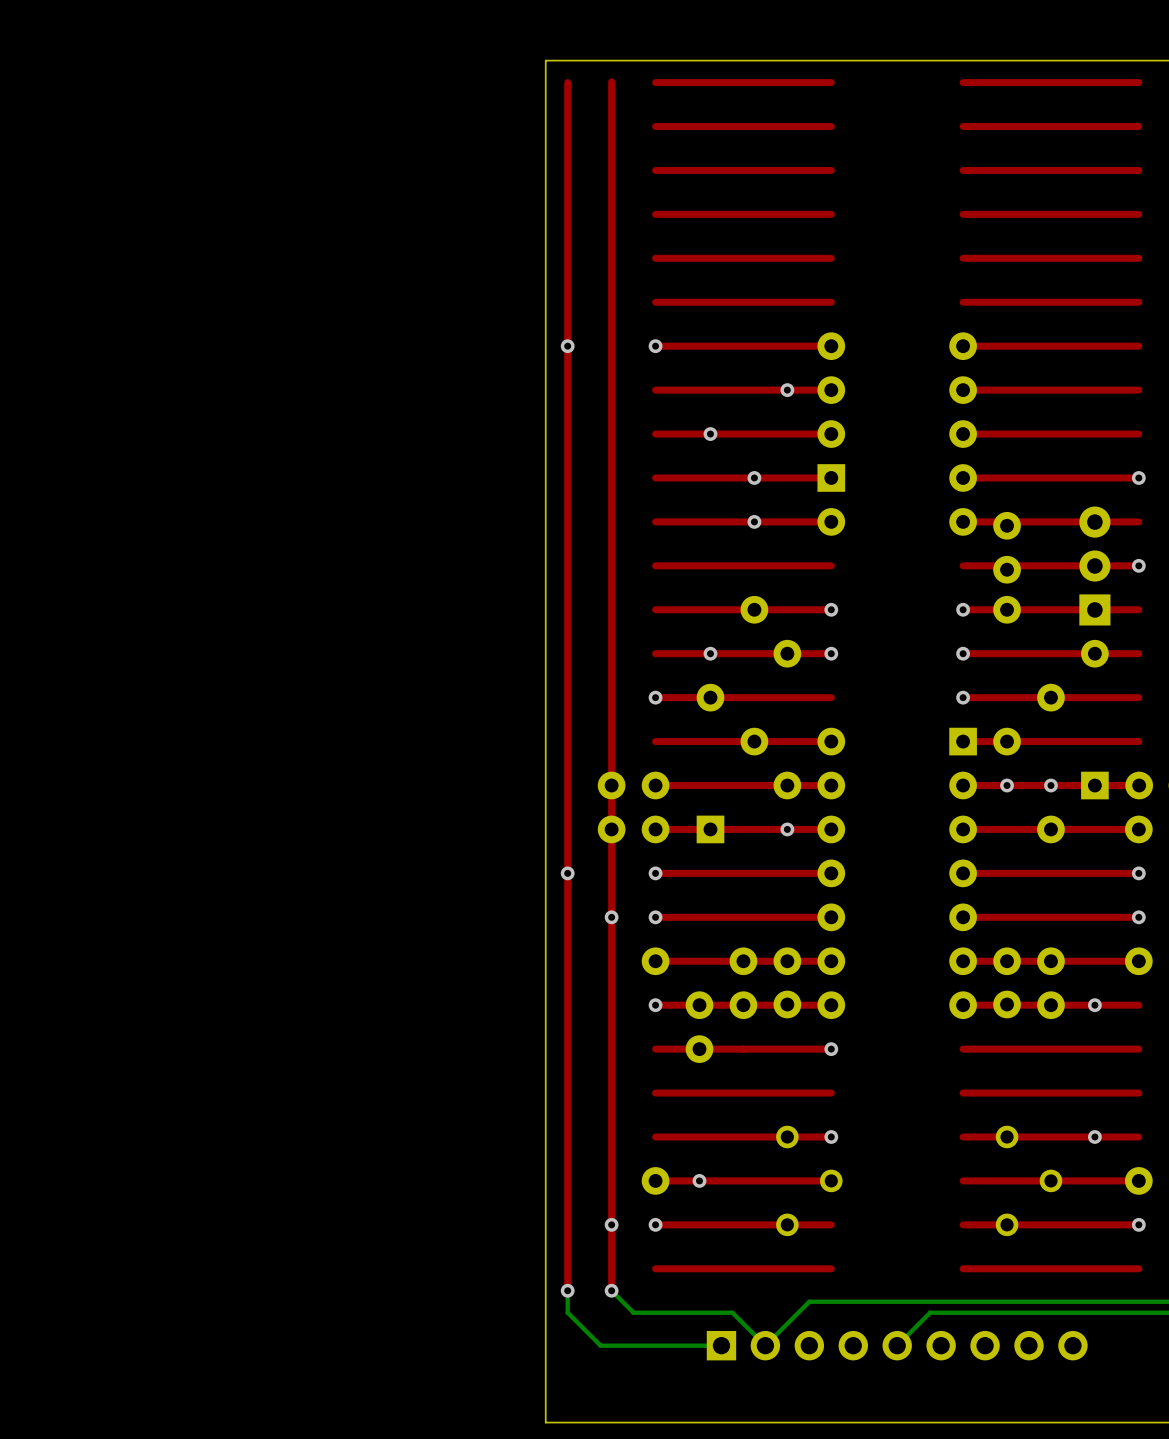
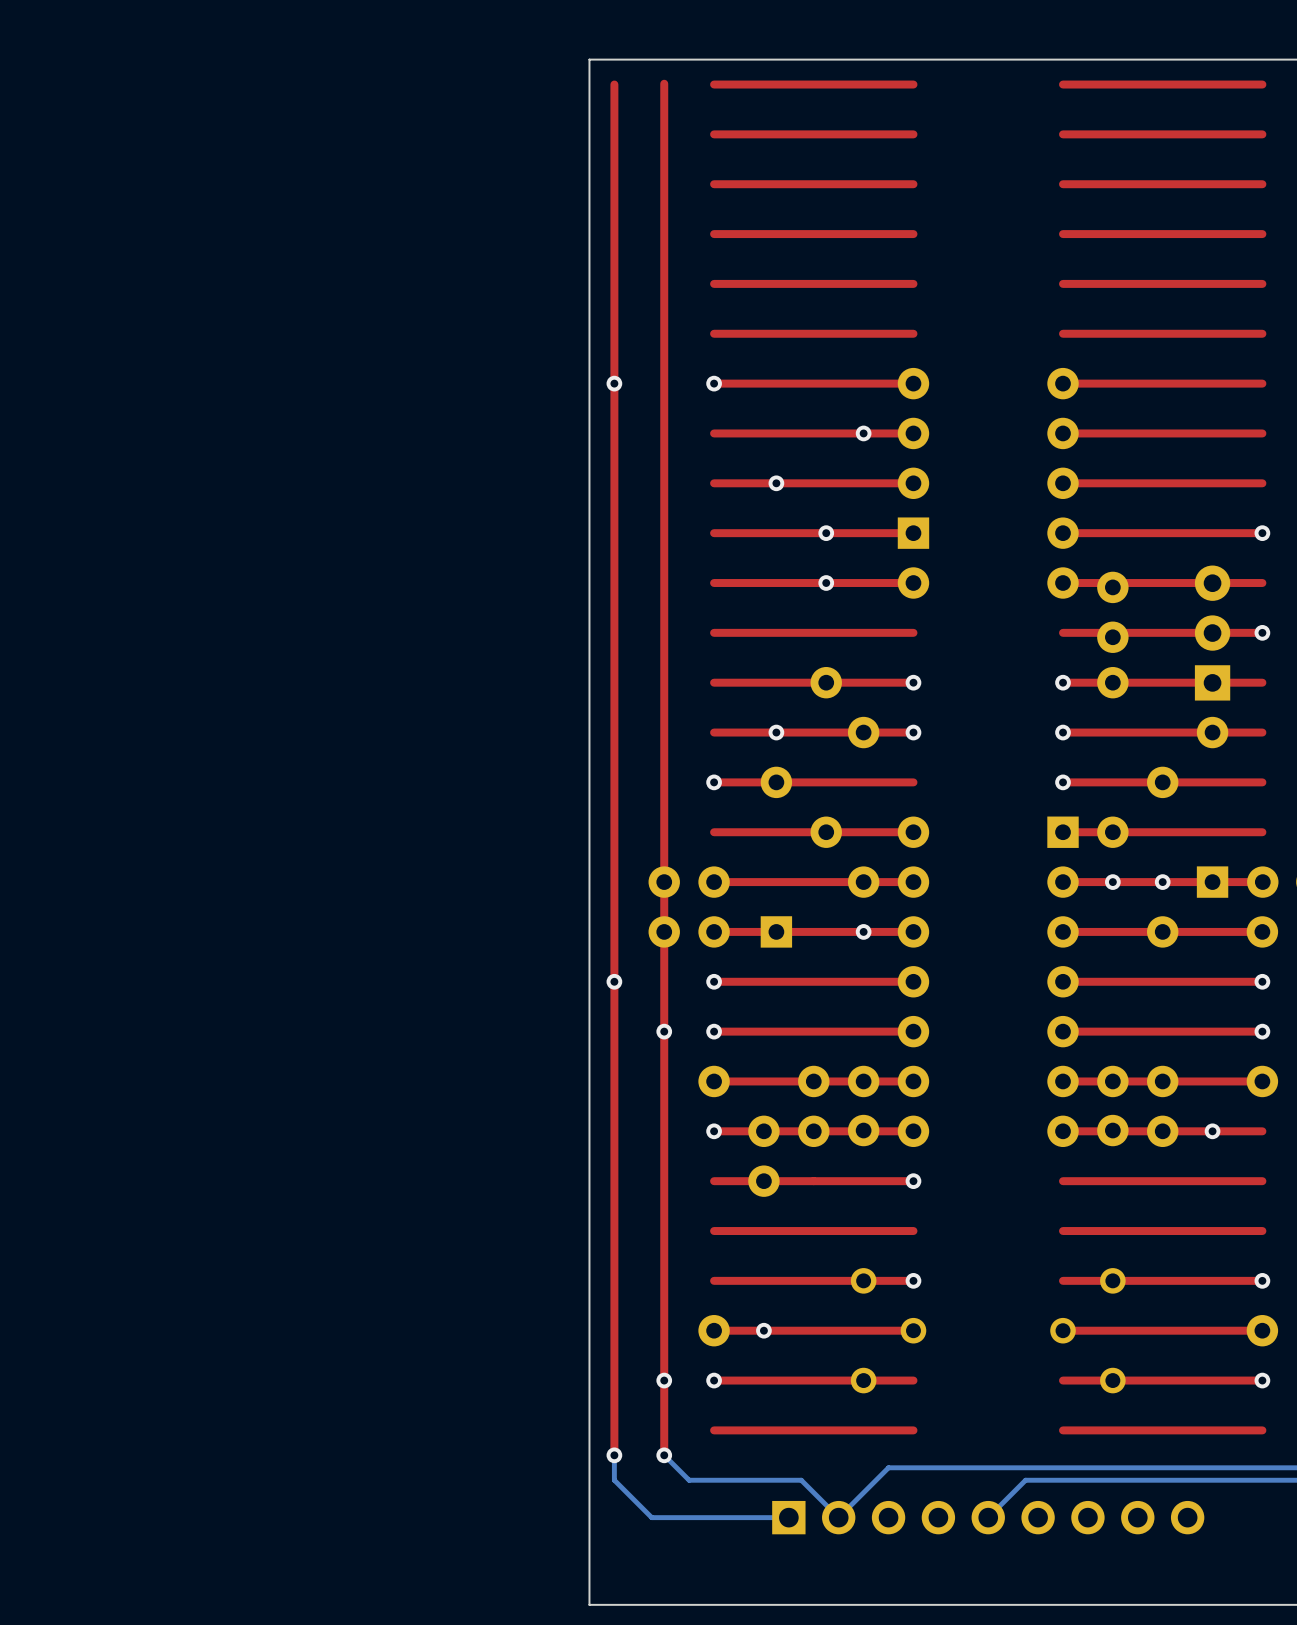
via: (1094, 1136) -> none
via: none -> (1262, 1280)
part rotation: 0° (1029, 1180) -> 180° (1087, 1330)

